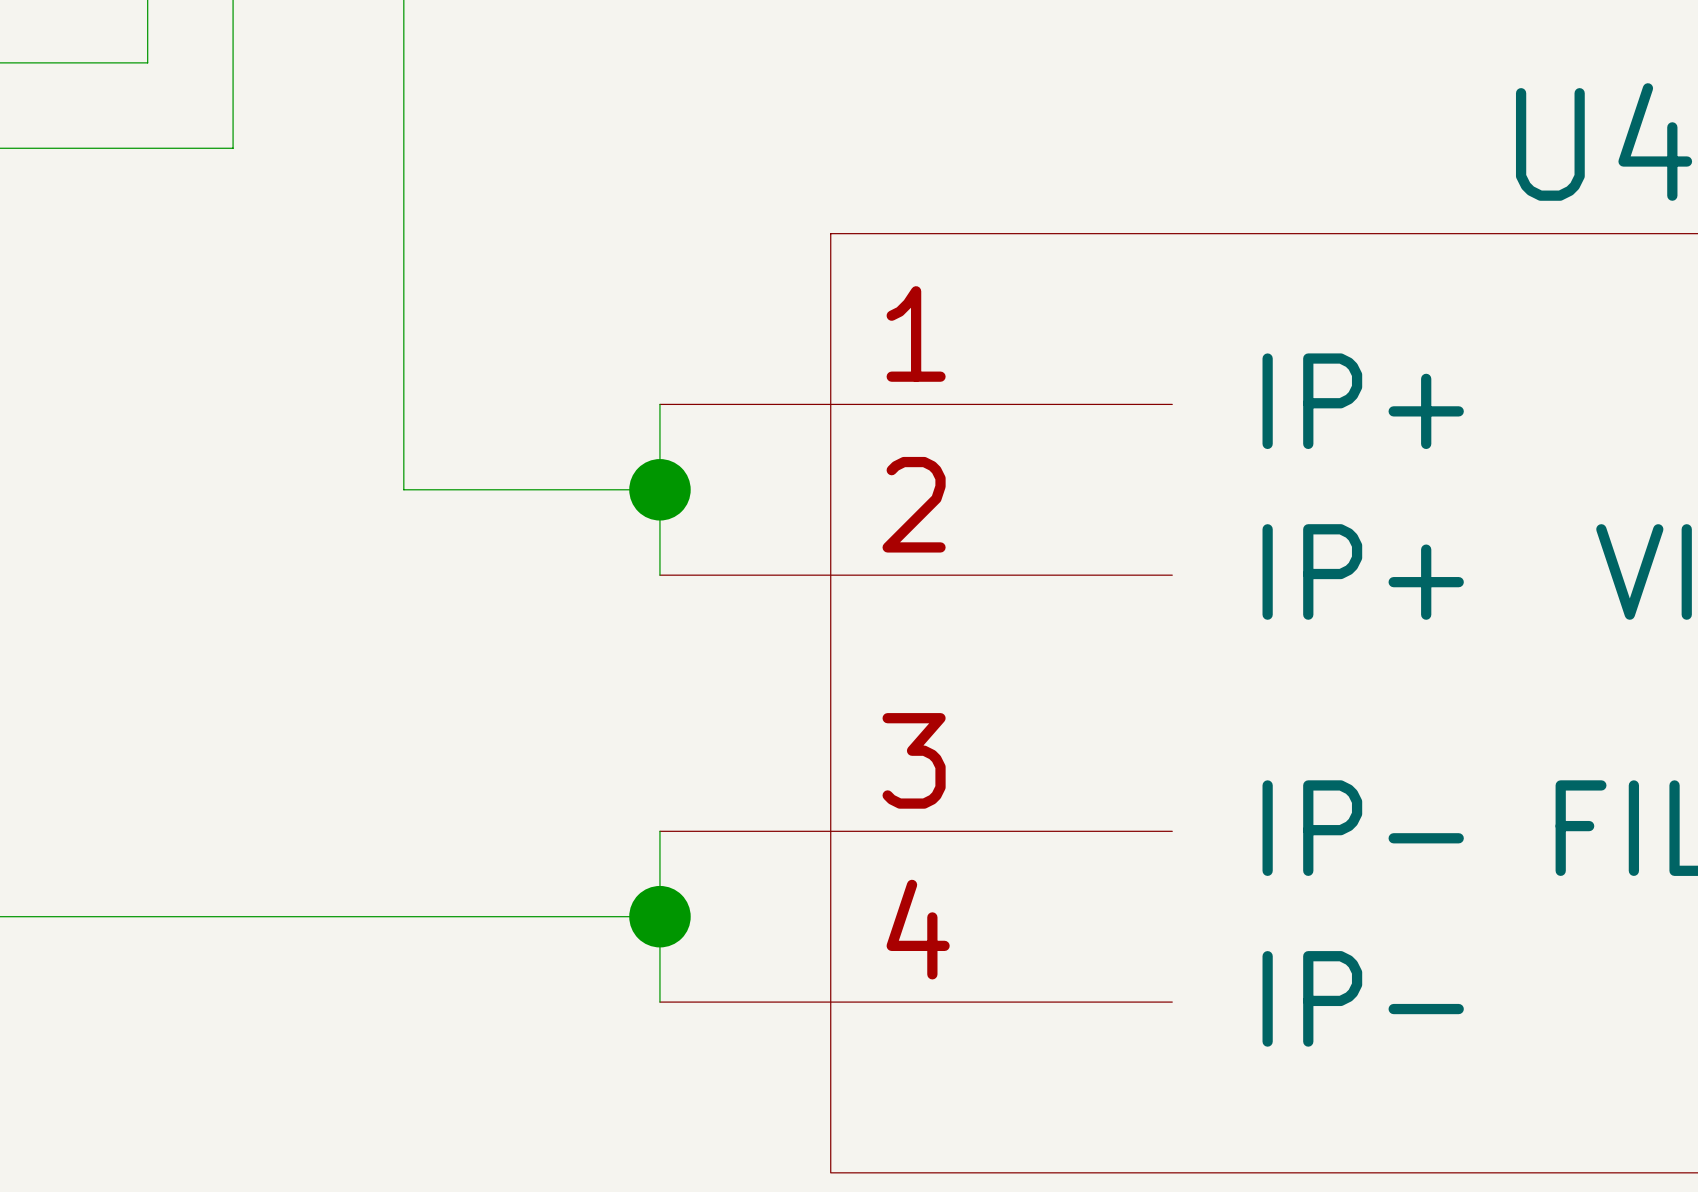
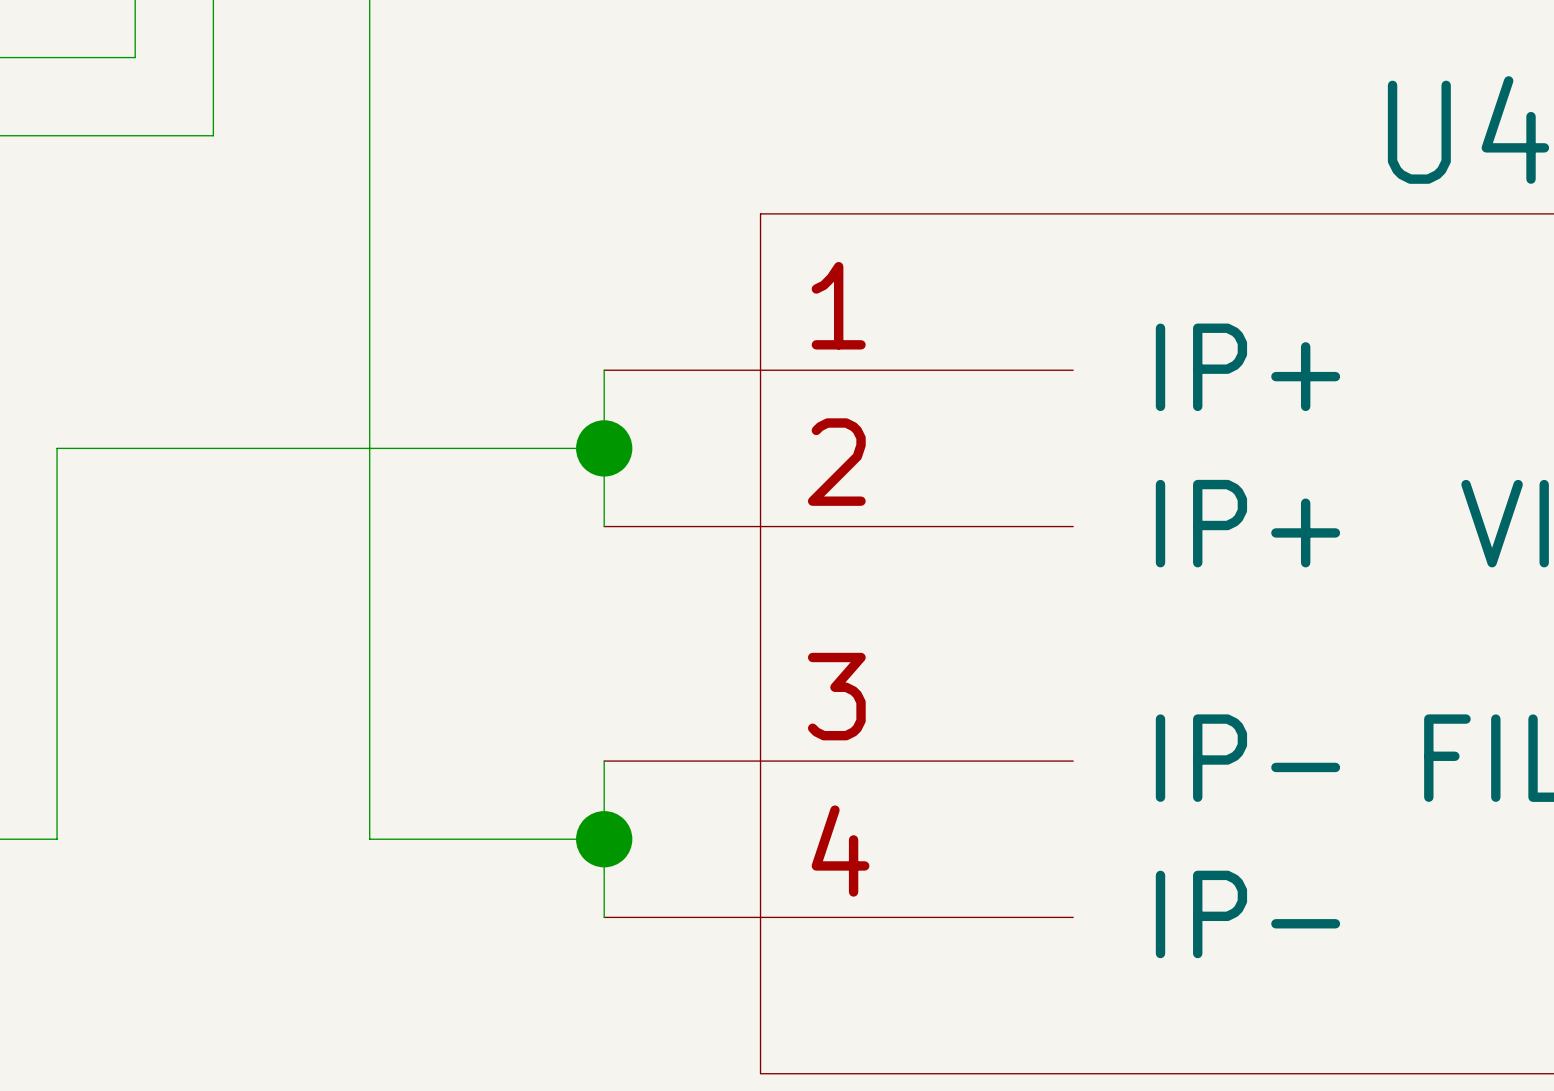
wire: (62, 916) (403, 916) -> (57, 839) (57, 448) (369, 448) (369, 839)

